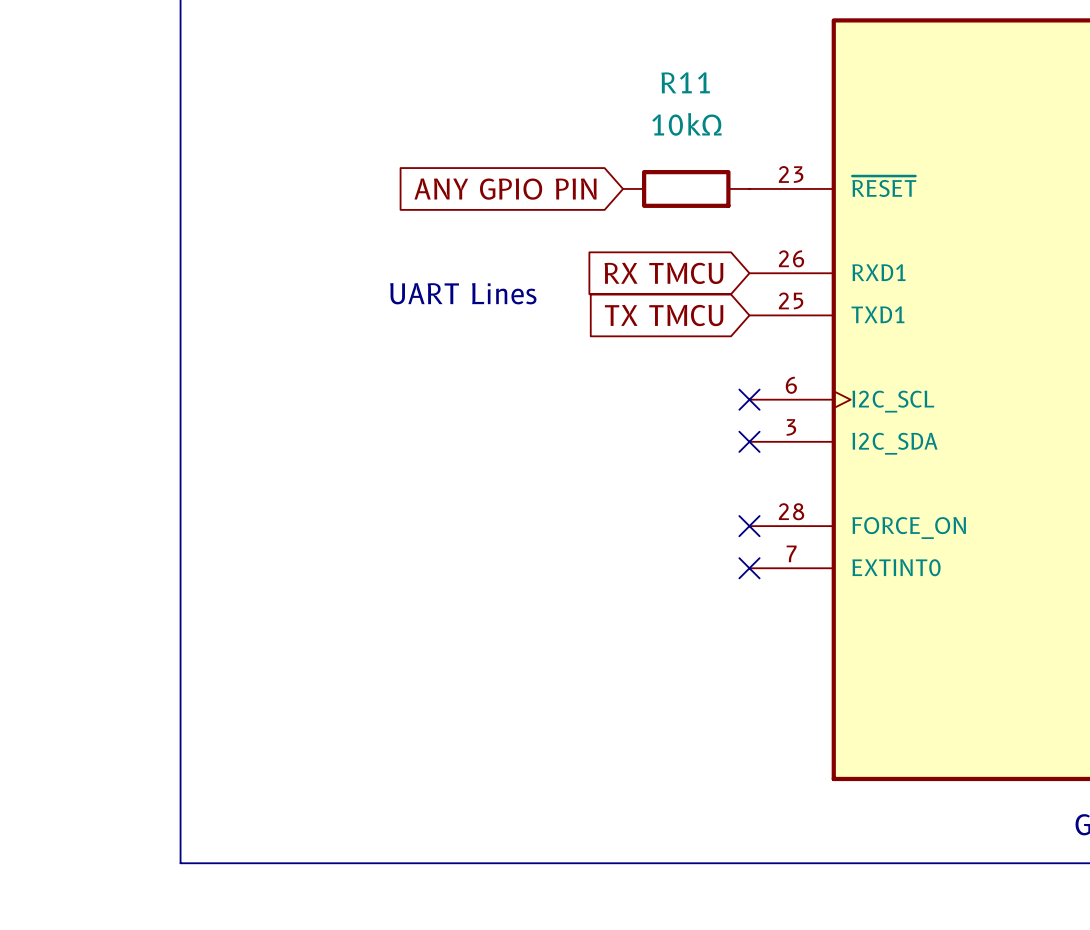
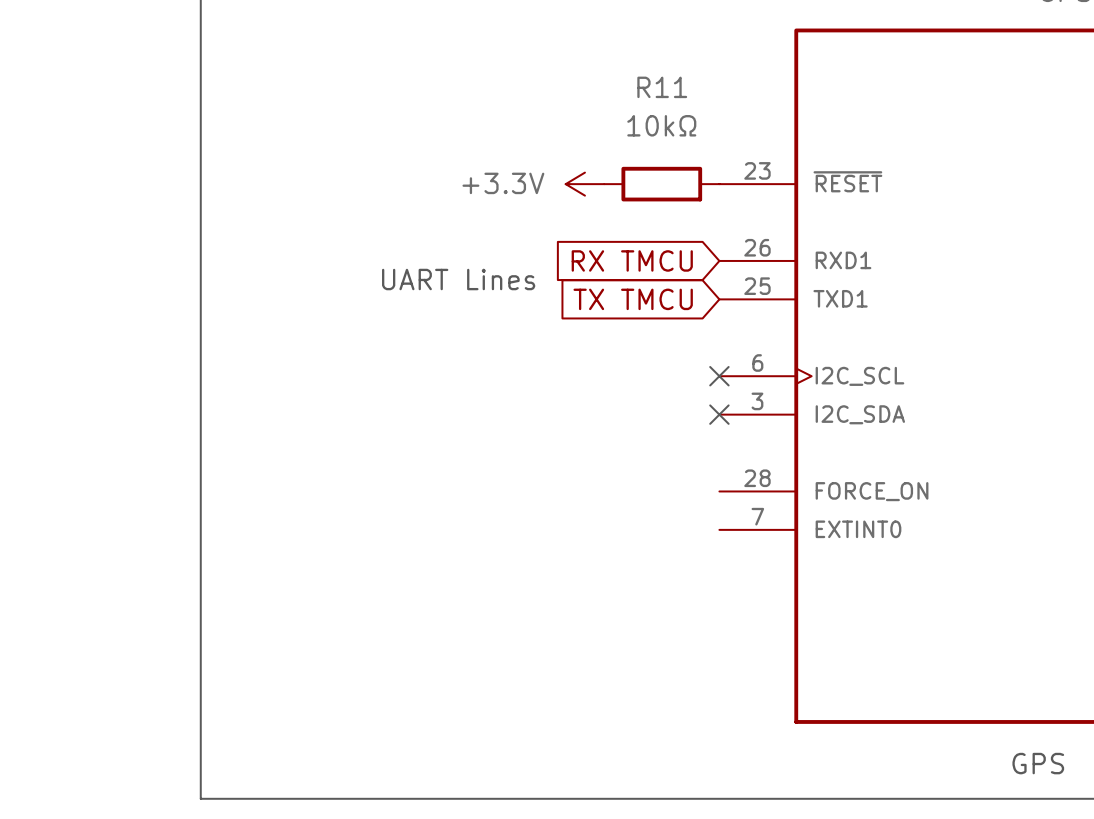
power symbol: none -> +3.3V (584, 184)
global label: ANY GPIO PIN (505, 189) -> none
no-connect mark: (749, 526) -> none
no-connect mark: (749, 568) -> none

